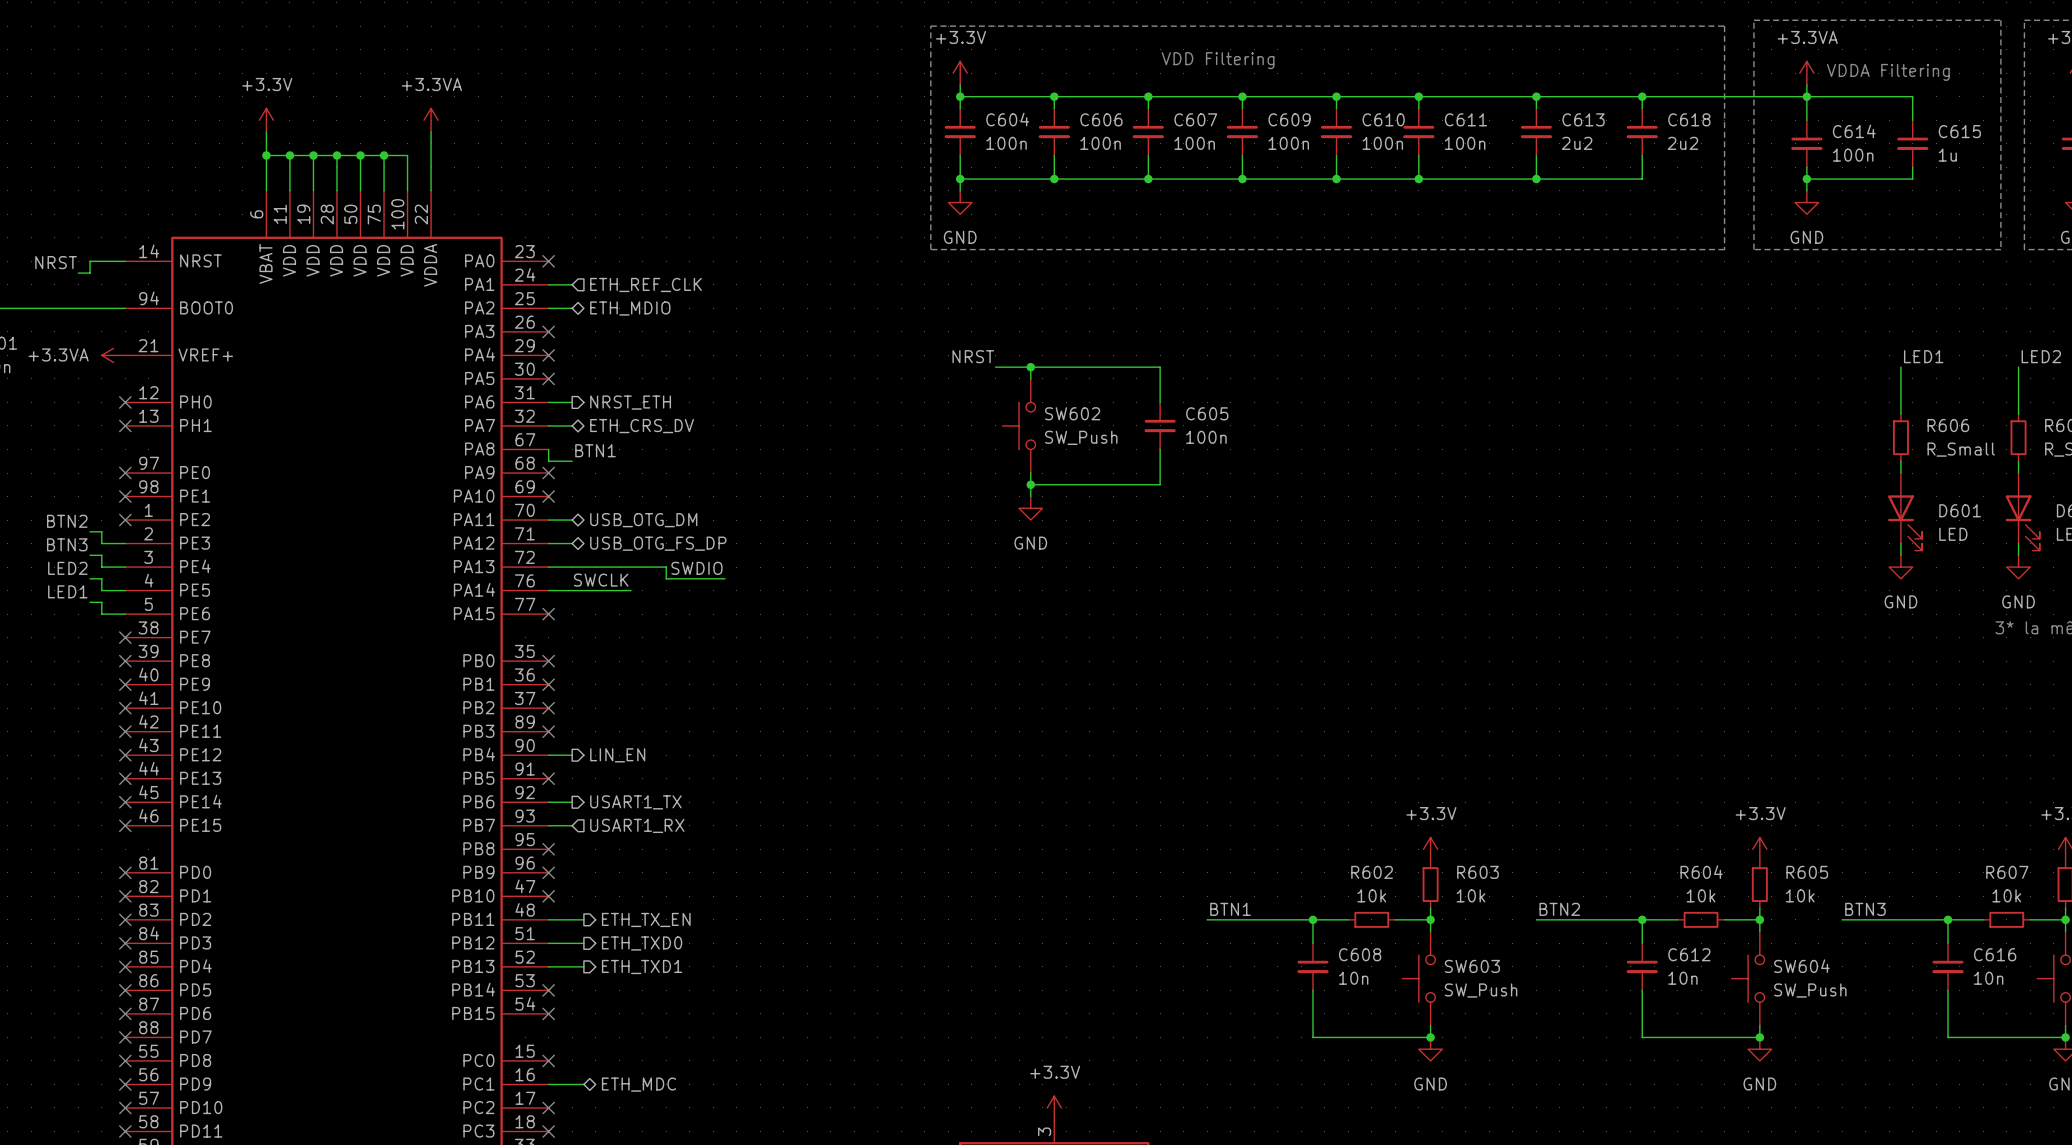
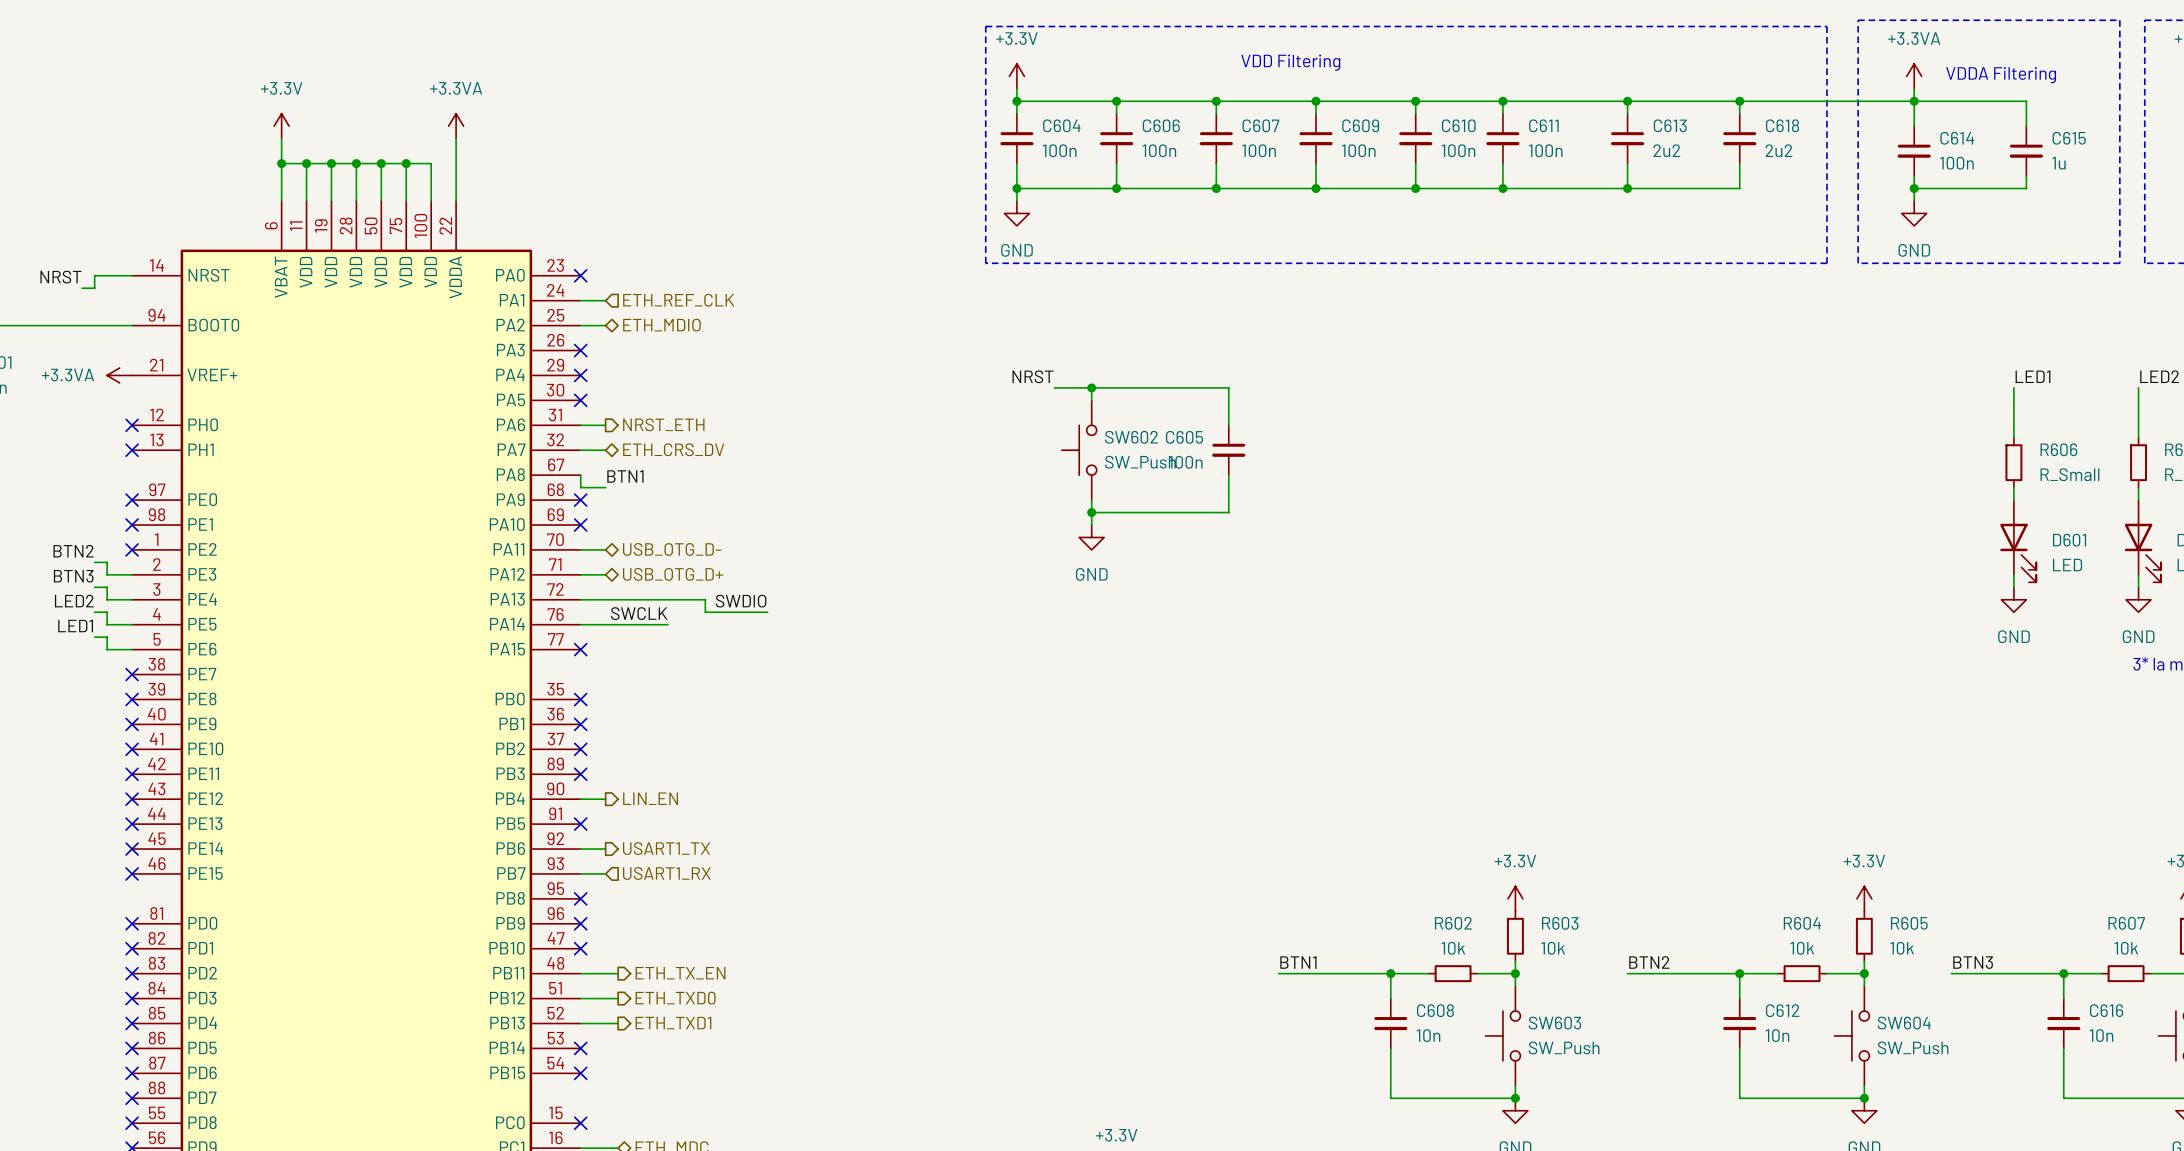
C605 name position: C605 (1207, 413) -> C605 (1184, 437)
C605 value position: 100n (1206, 437) -> 100n (1185, 462)
hierarchical label: USB_OTG_DM (643, 520) -> USB_OTG_D- (672, 549)
hierarchical label: USB_OTG_FS_DP (658, 543) -> USB_OTG_D+ (673, 574)

